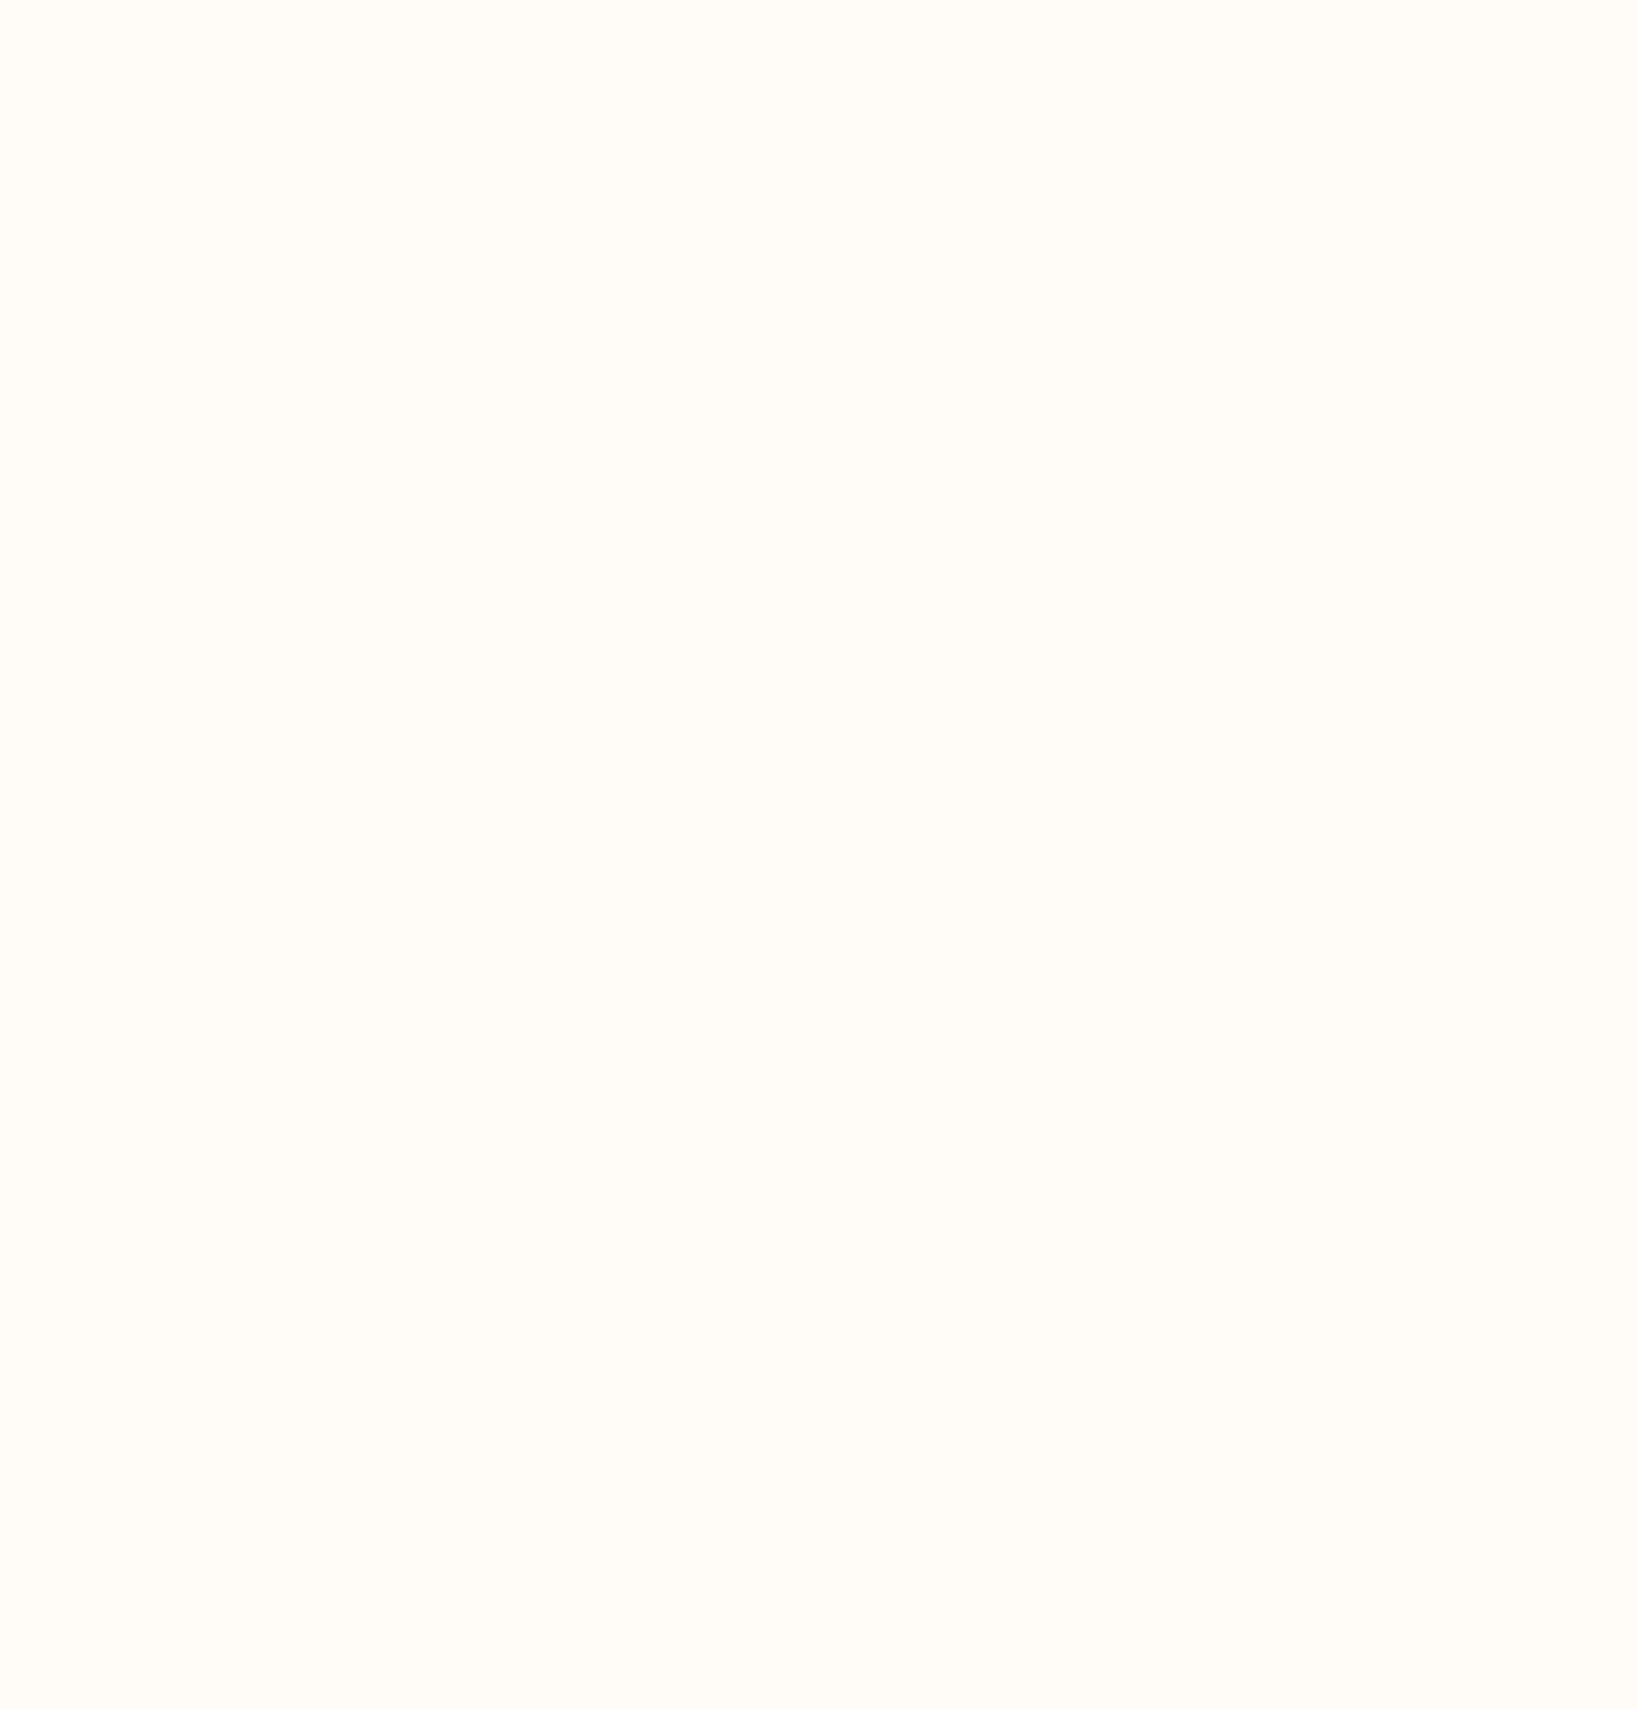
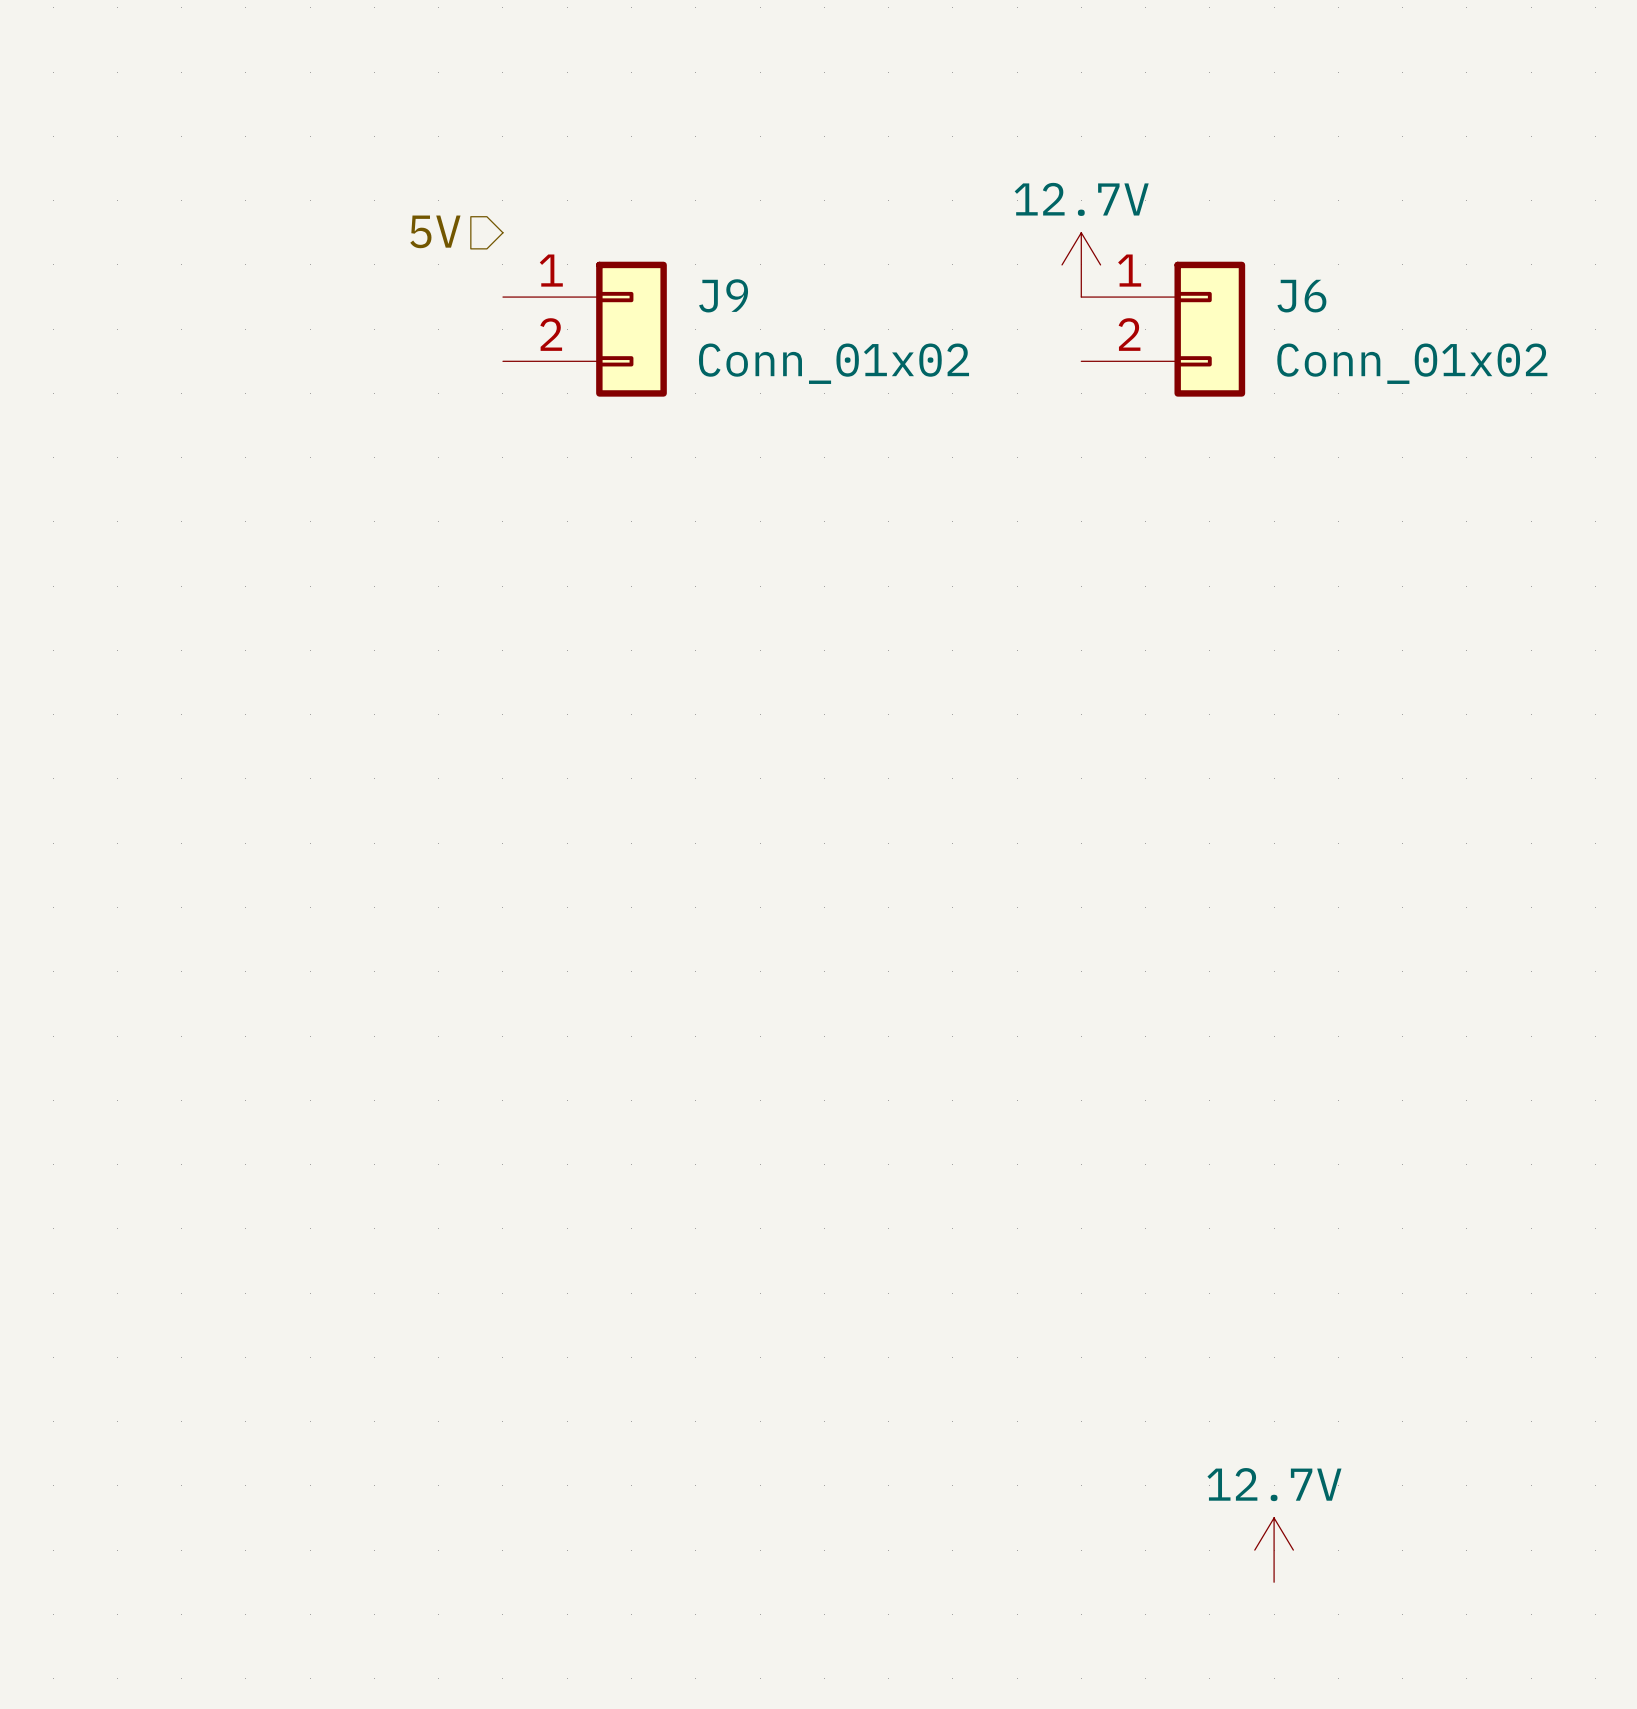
hierarchical label: none -> 5V (435, 231)
power symbol: none -> 12.7V (1081, 264)
J9: none -> Conn_01x02 (584, 329)
J6: none -> Conn_01x02 (1163, 329)
power symbol: none -> 12.7V (1274, 1550)

